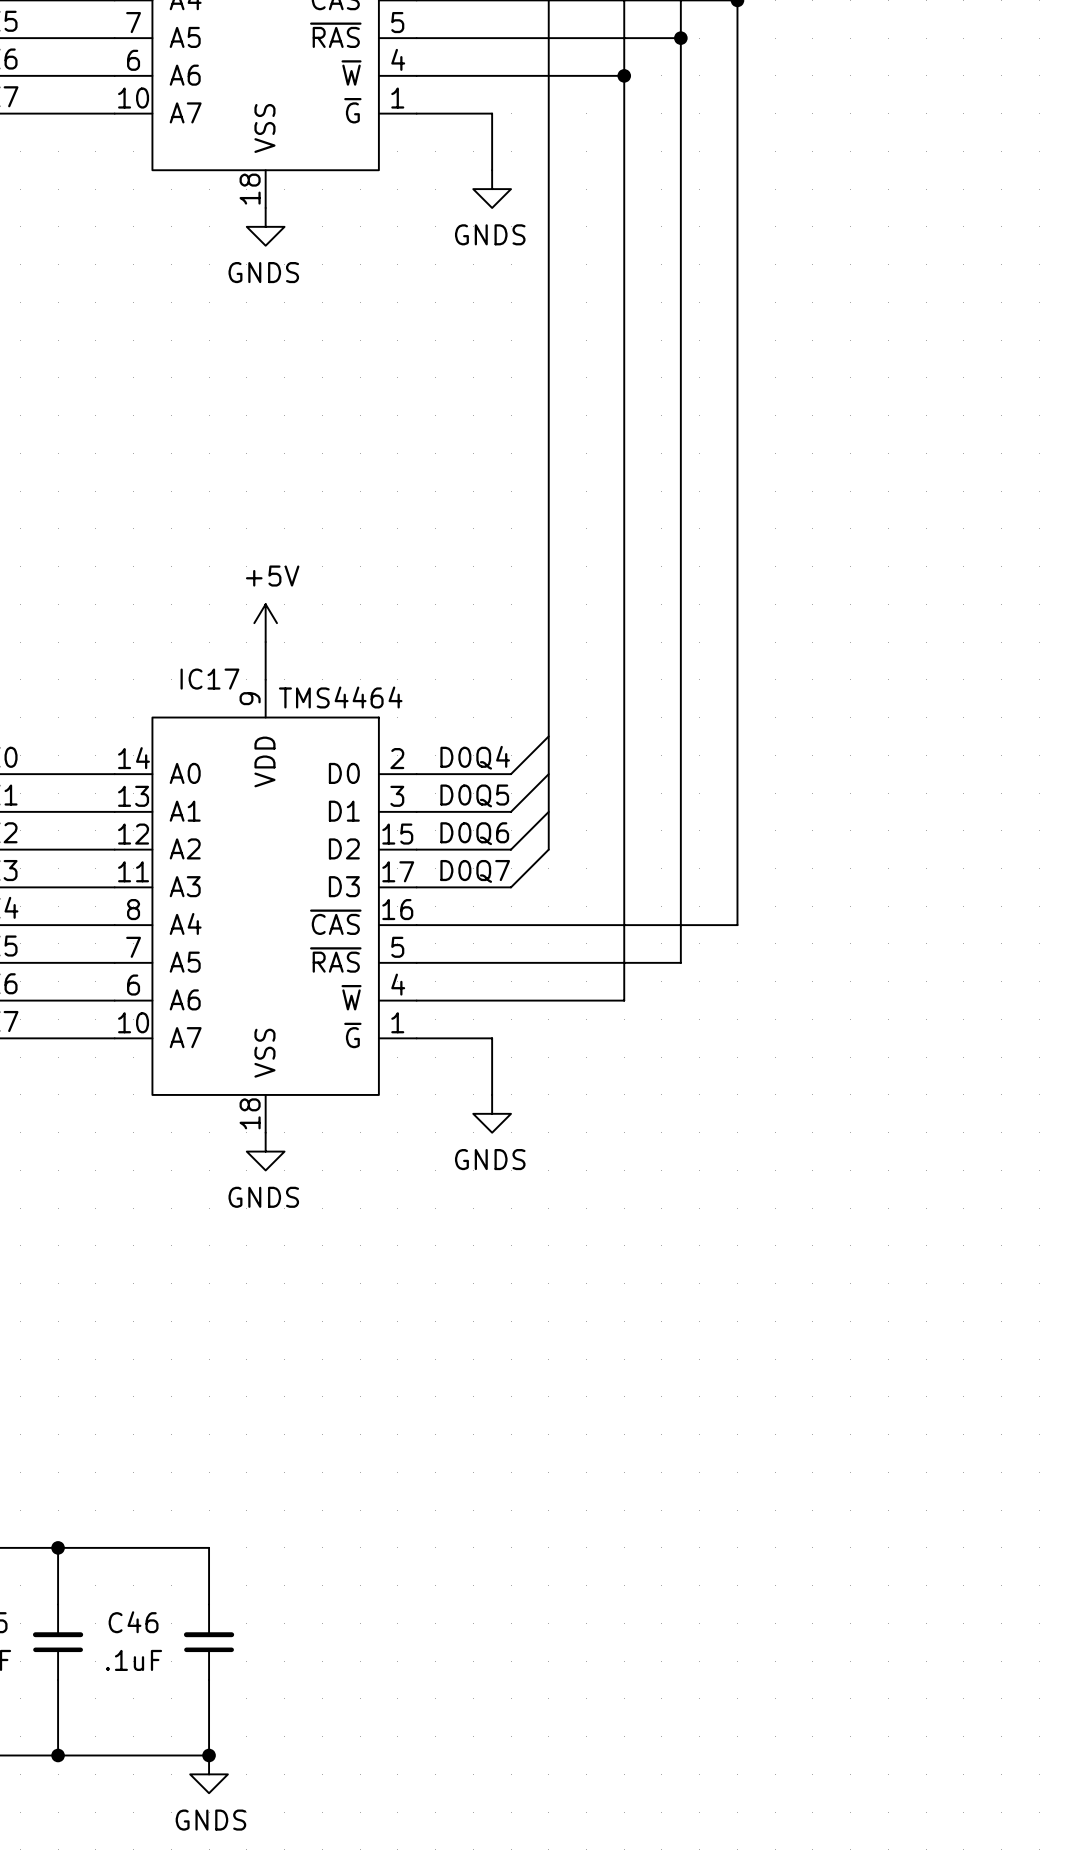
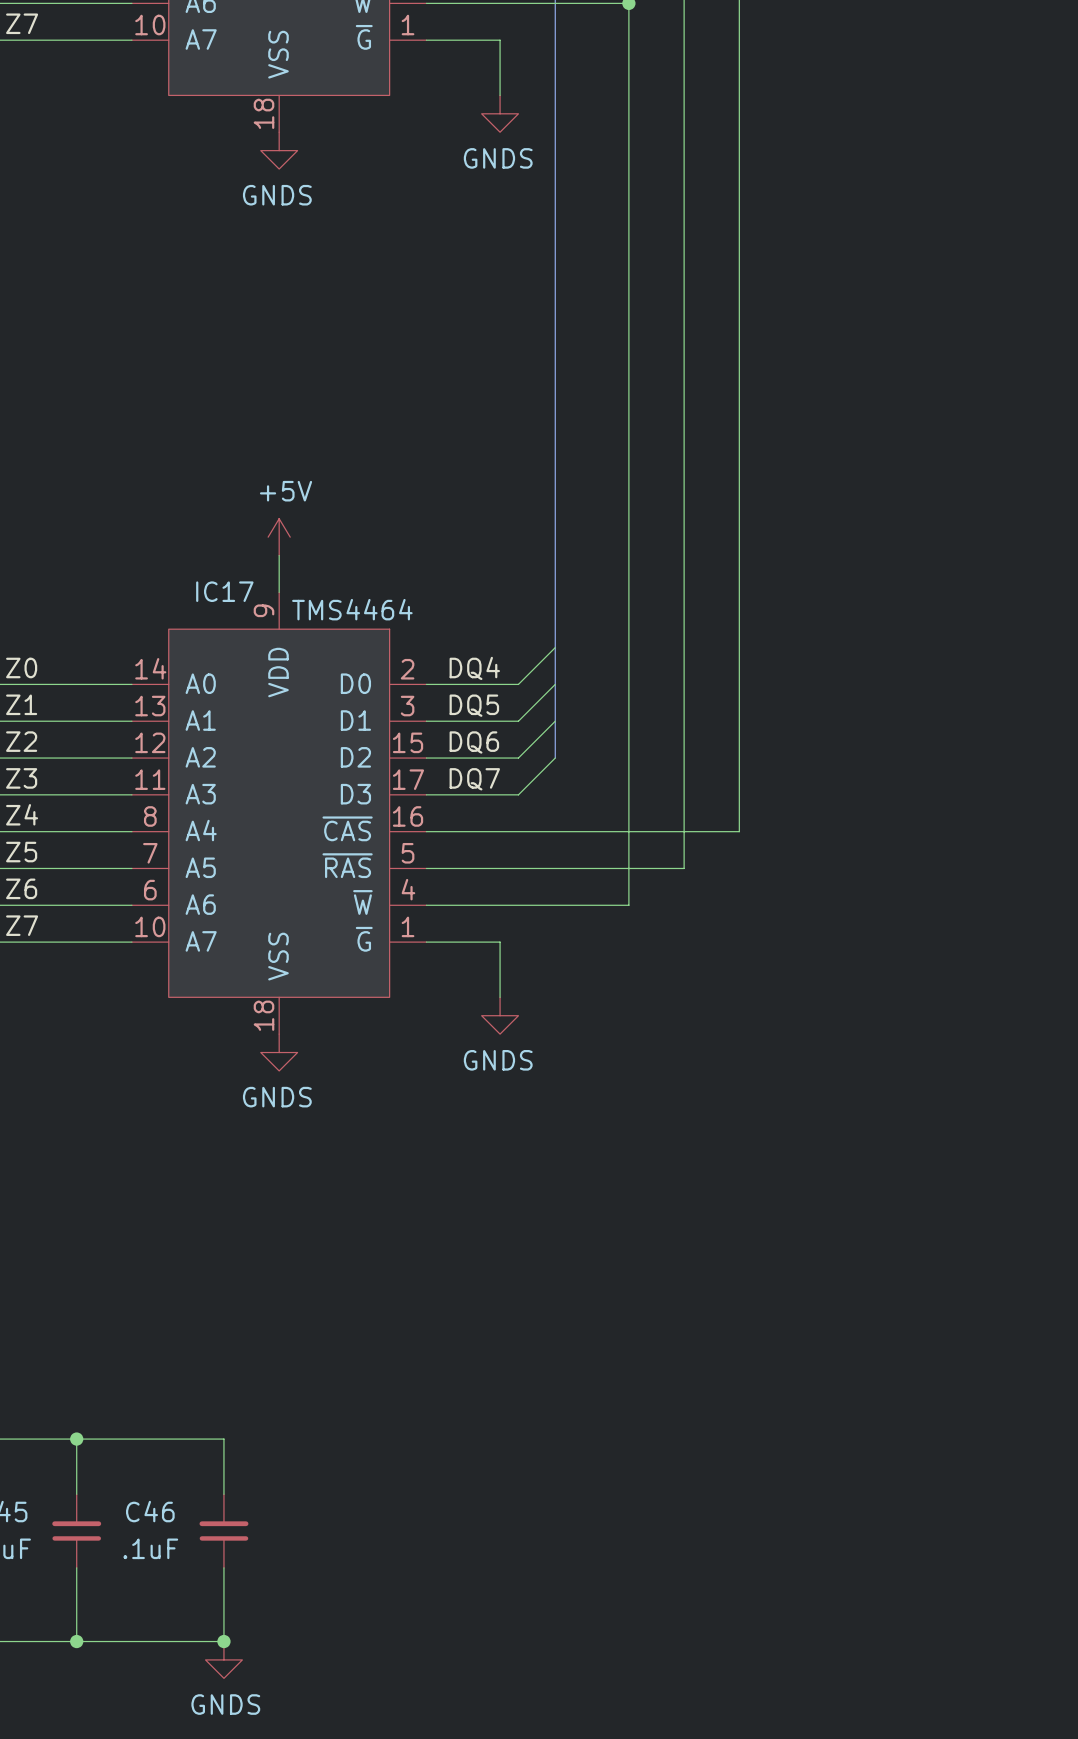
label: D0Q4 (475, 757) -> DQ4 (474, 668)
label: D0Q5 (474, 795) -> DQ5 (474, 705)
label: D0Q6 (474, 833) -> DQ6 (474, 742)
label: D0Q7 (475, 871) -> DQ7 (474, 779)

